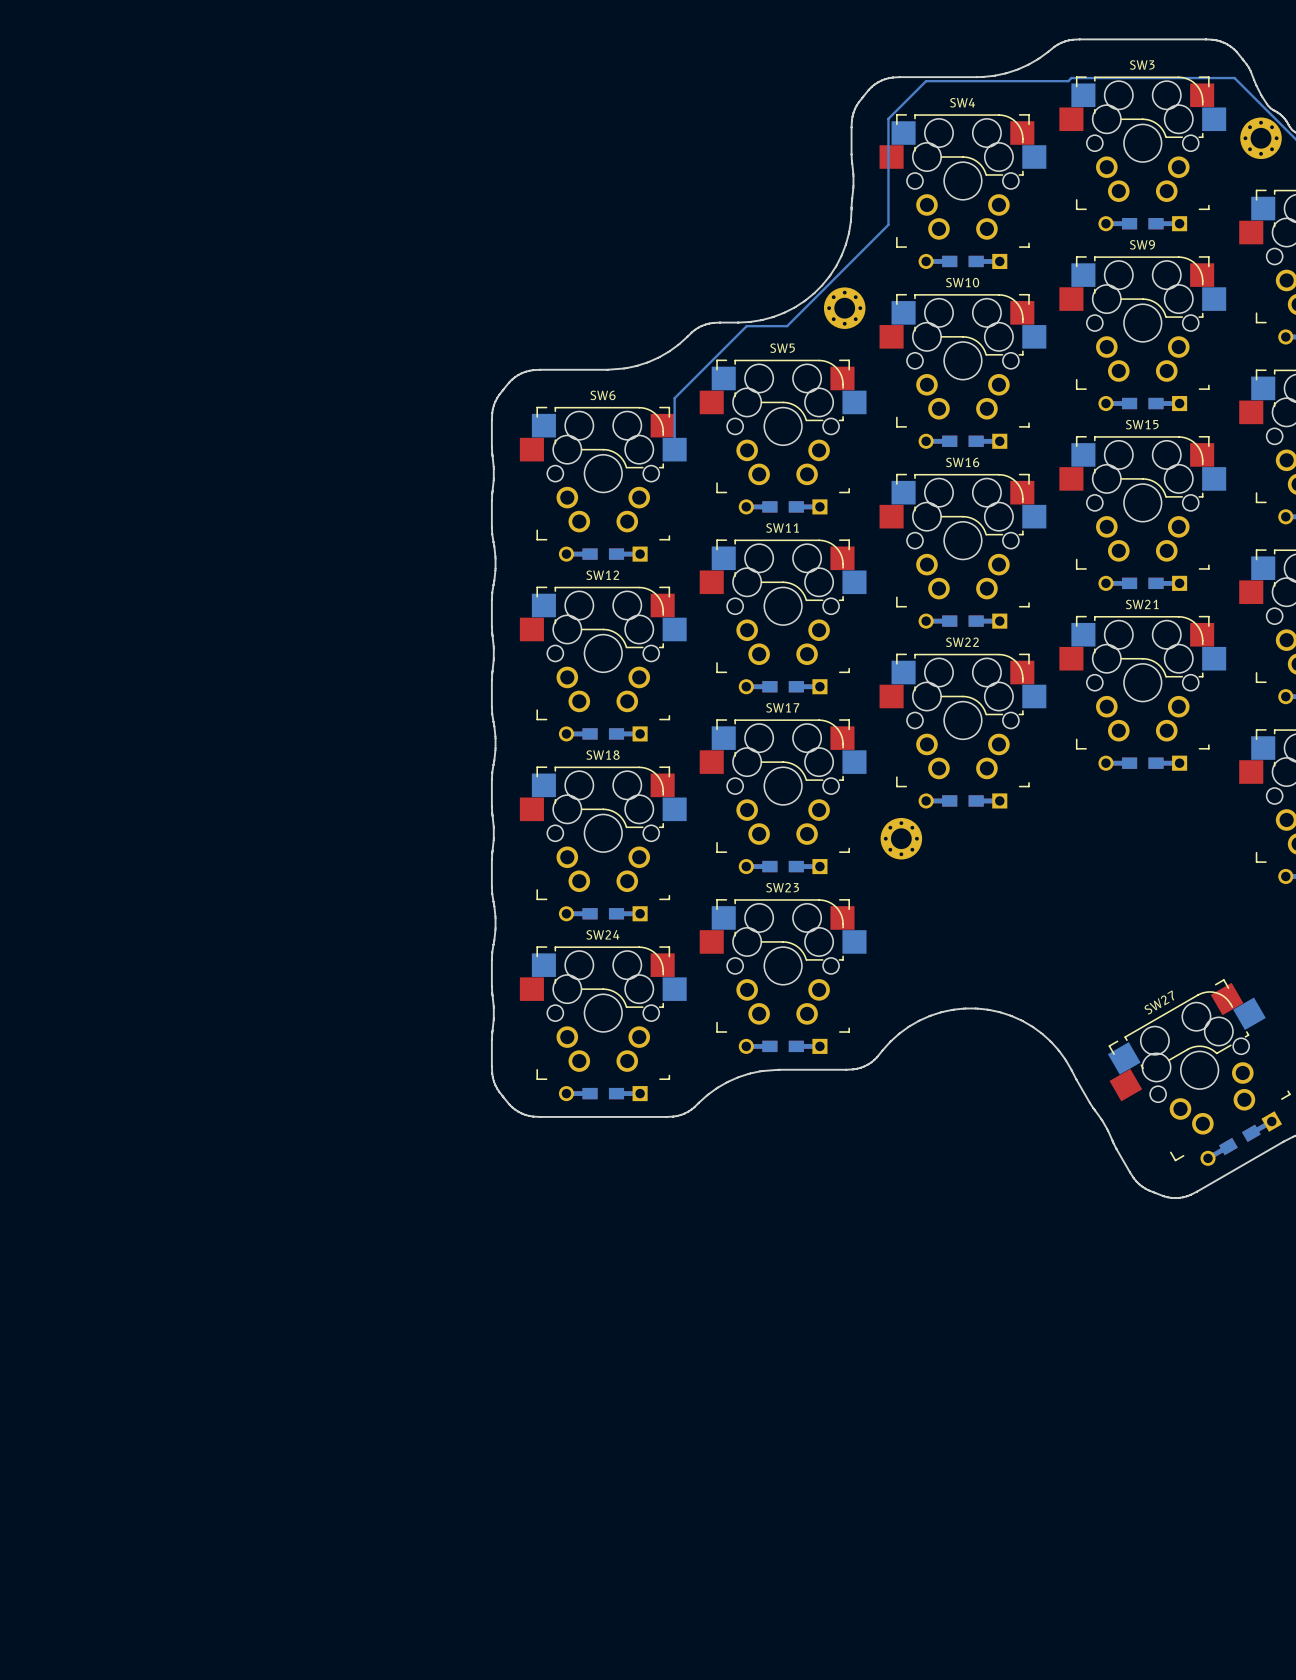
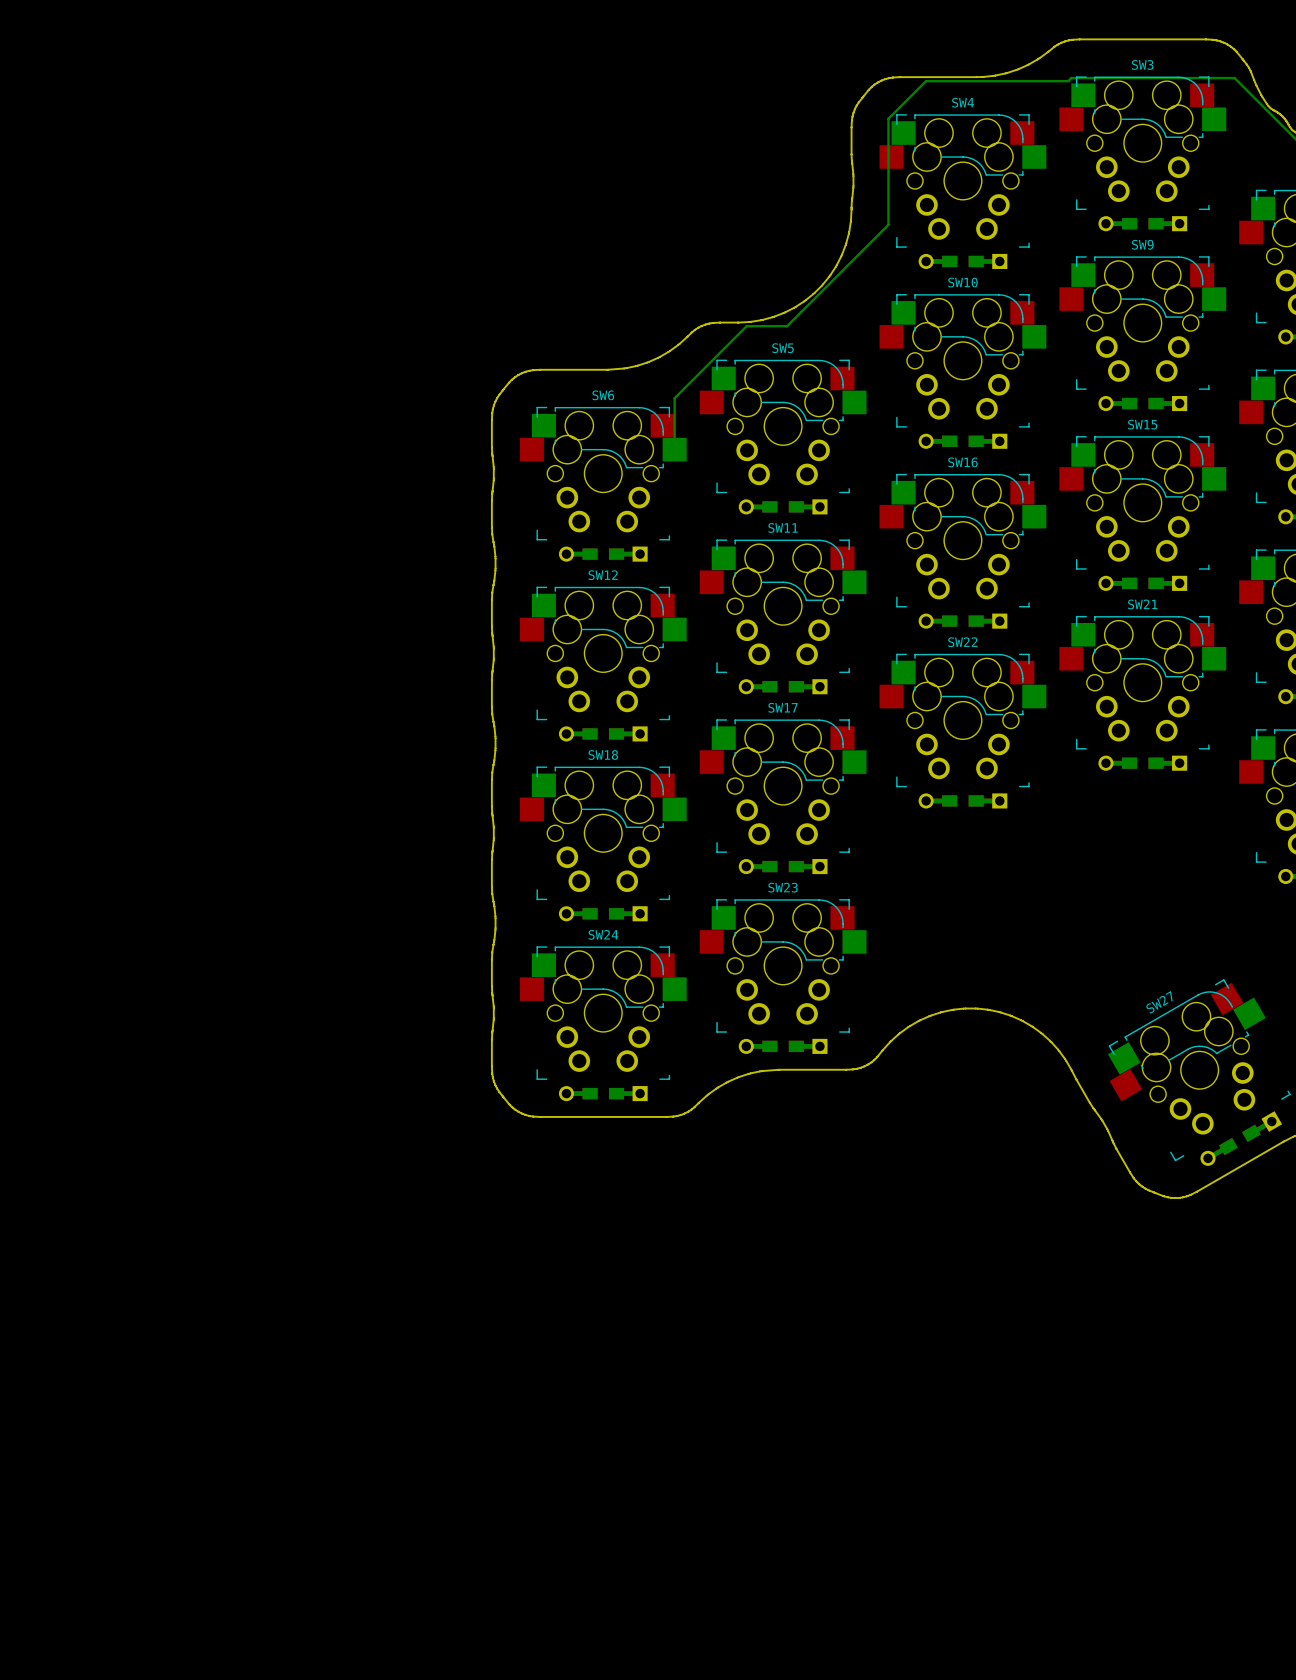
part: (1261, 138) -> none
part: (844, 308) -> none
part: (901, 838) -> none

